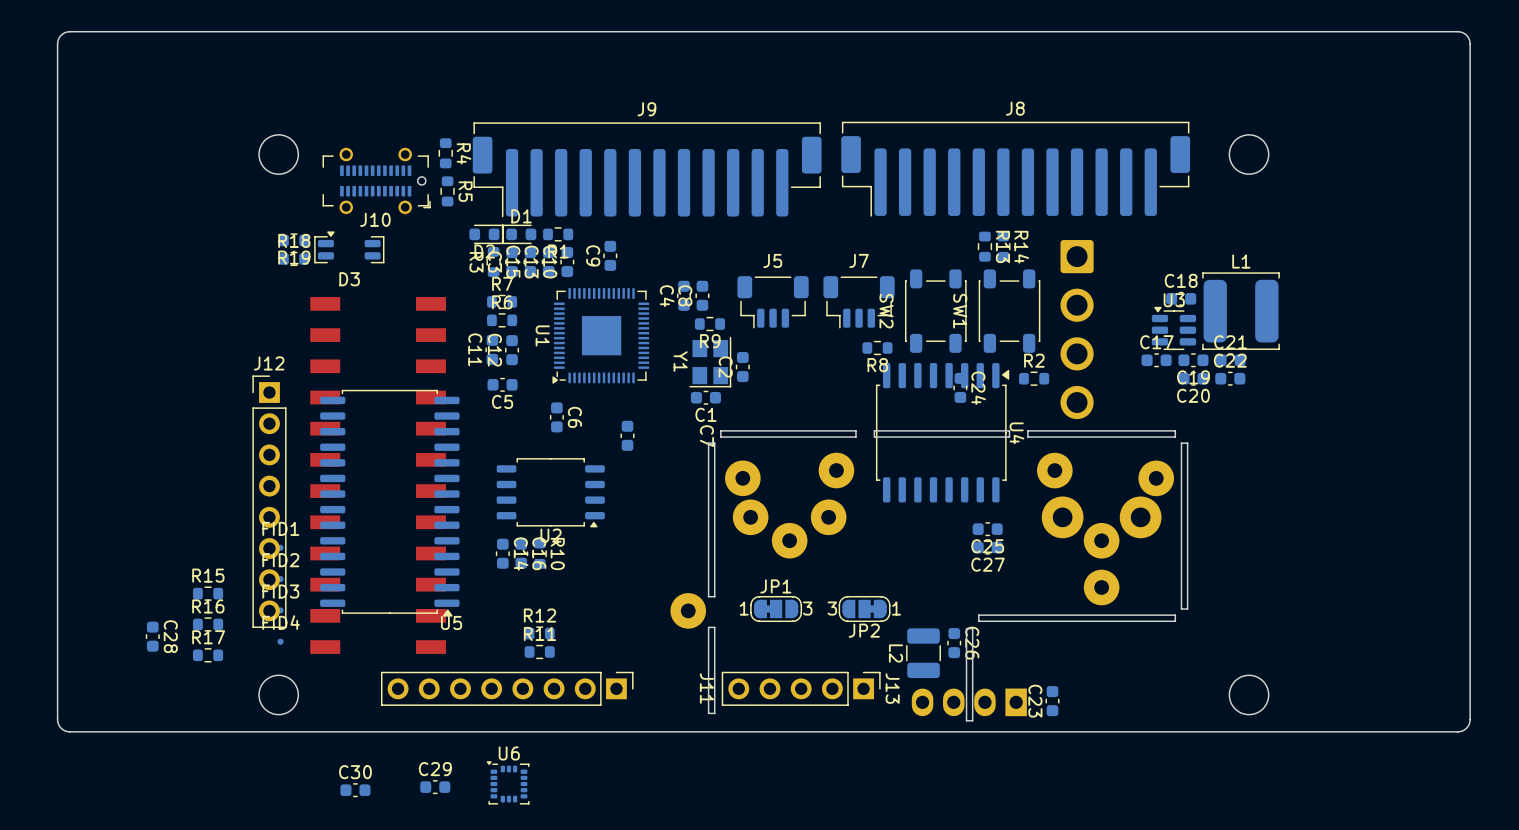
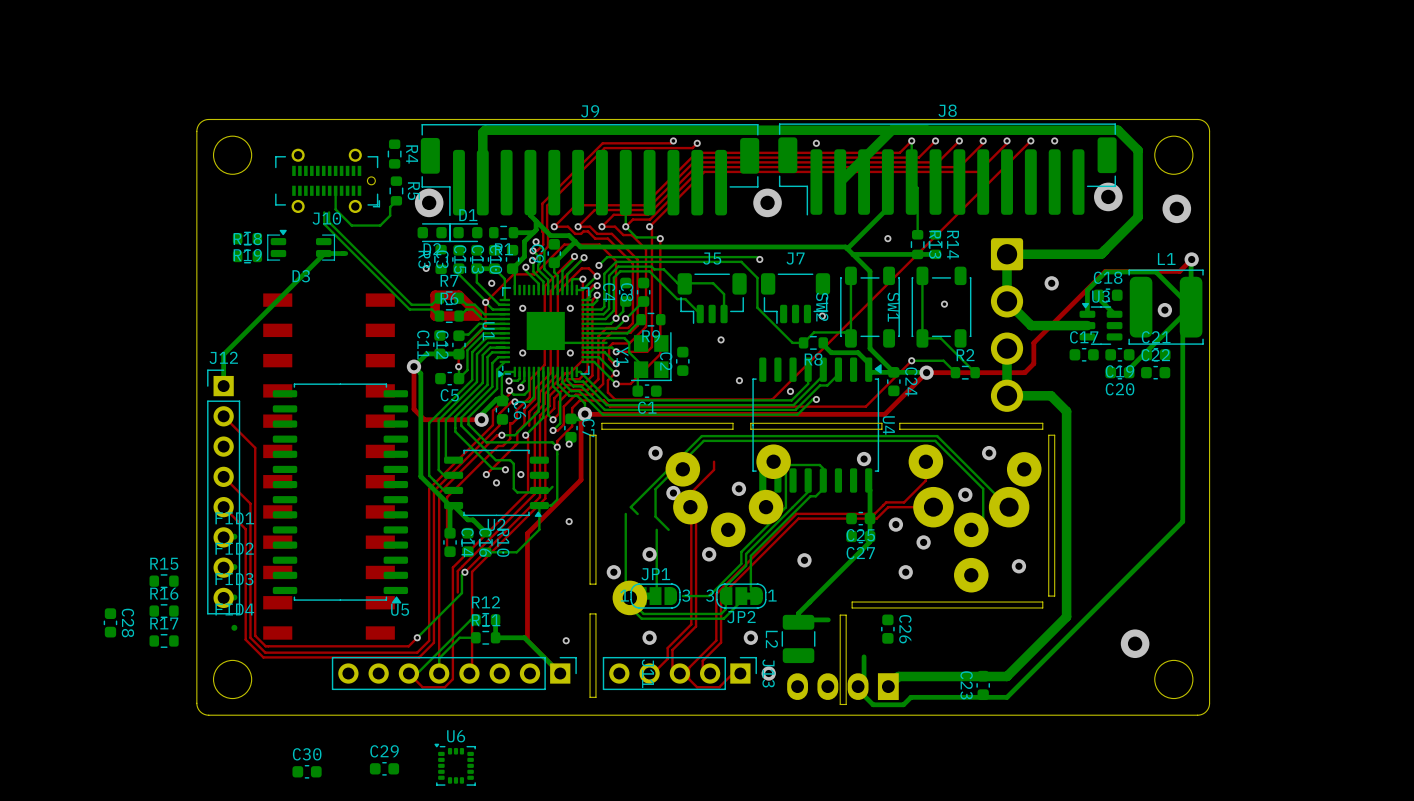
bottom track: none -> (892, 130) (840, 182)
top track: none -> (673, 140) (671, 143) (602, 143) (542, 203) (543, 244) (537, 250) (532, 250)
via: none -> (673, 140)
top track: none -> (911, 140) (899, 152) (696, 152) (644, 205) (575, 205) (554, 226) (567, 226) (575, 233) (588, 231) (595, 238) (607, 238) (632, 263) (632, 323) (628, 327) (606, 327) (598, 336) (598, 379) (587, 389) (570, 389) (559, 401) (559, 413) (553, 419)
bottom track: none -> (911, 140) (911, 182) (917, 188) (917, 234)
via: none -> (911, 140)
top track: none -> (935, 140) (918, 157) (698, 157) (646, 210) (594, 210) (578, 226) (590, 226) (597, 233) (611, 233) (637, 259) (637, 325) (630, 332) (611, 332) (603, 341) (603, 383) (592, 394) (575, 394) (563, 406) (563, 424) (557, 430) (553, 430)
via: none -> (935, 140)
top track: none -> (959, 140) (937, 162) (700, 162) (648, 214) (613, 214) (601, 226) (615, 226) (623, 235) (631, 235) (646, 249) (646, 326) (629, 343) (612, 343) (609, 347) (609, 358) (616, 363)
via: none -> (959, 140)
top track: none -> (983, 140) (983, 143) (959, 167) (702, 167) (650, 219) (632, 219) (625, 226)
via: none -> (983, 140)
top track: none -> (1007, 140) (1007, 143) (978, 171) (704, 171) (649, 226) (651, 229) (651, 347) (647, 351) (616, 351) (617, 350)
via: none -> (1007, 140)
top track: none -> (1030, 140) (772, 399) (615, 399) (607, 392) (607, 380) (616, 373)
via: none -> (1030, 140)
via: none -> (1054, 140)
top track: none -> (697, 143) (692, 148) (604, 148) (547, 205) (547, 246) (532, 260)
via: none -> (697, 143)
via: none -> (816, 143)
bottom track: none -> (482, 182) (482, 132) (485, 130) (1117, 130) (1138, 150) (1138, 217) (1100, 254) (1007, 254) (1007, 301) (1031, 325) (1087, 325)
bottom track: none -> (530, 182) (530, 215) (550, 235) (569, 235) (580, 246) (845, 246) (870, 271) (870, 348) (893, 372)
bottom track: none -> (625, 182) (625, 226) (636, 237) (660, 238)
bottom track: none -> (887, 182) (887, 208) (847, 248)
bottom track: none -> (335, 190) (335, 209) (351, 225) (380, 225) (390, 215) (390, 207) (396, 200)
via: none -> (1108, 196)
via: none -> (429, 202)
via: none -> (767, 202)
via: none -> (1176, 208)
bottom track: none -> (324, 212) (324, 224) (409, 309) (432, 309) (439, 316)
bottom track: none -> (329, 212) (329, 222) (411, 304) (432, 304) (439, 298)
bottom track: none -> (536, 221) (536, 229) (524, 241) (524, 256) (512, 268) (514, 270) (514, 289)
via: none -> (554, 226)
via: none -> (578, 226)
via: none -> (601, 226)
via: none -> (625, 226)
via: none -> (649, 226)
bottom track: none -> (533, 232) (513, 232)
top track: none -> (660, 238) (660, 354) (630, 383) (616, 383)
via: none -> (660, 238)
via: none -> (887, 238)
bottom track: none -> (536, 241) (544, 250) (544, 269) (552, 277) (552, 290)
via: none -> (536, 241)
bottom track: none -> (575, 241) (554, 262) (554, 272) (557, 275) (557, 290)
via: none -> (532, 250)
bottom track: none -> (345, 253) (323, 253) (223, 354) (223, 386)
bottom track: none -> (535, 253) (539, 257) (538, 269) (548, 279) (548, 290)
bottom track: none -> (935, 254) (853, 254)
top track: none -> (574, 256) (544, 286) (544, 364) (529, 379) (529, 397) (516, 410) (516, 419) (510, 423) (510, 438) (503, 445) (498, 445) (447, 497) (445, 553)
bottom track: none -> (574, 256) (574, 258) (562, 270) (562, 290)
via: none -> (574, 256)
top track: none -> (584, 257) (550, 291) (550, 373) (535, 388) (535, 399) (524, 409) (524, 424) (517, 431) (517, 443) (486, 474)
bottom track: none -> (584, 257) (567, 274) (567, 290)
via: none -> (584, 257)
bottom track: none -> (532, 260) (533, 271) (543, 281) (543, 290)
via: none -> (532, 260)
bottom track: none -> (759, 259) (757, 257) (607, 257) (598, 265)
via: none -> (759, 259)
top track: none -> (1191, 259) (1179, 271) (1105, 271) (1033, 342) (1033, 363) (1024, 372) (926, 372) (884, 414) (584, 414) (581, 417) (581, 479) (527, 533) (527, 640) (560, 673)
bottom track: none -> (1191, 259) (1191, 307) (1129, 369) (1129, 372)
via: none -> (1191, 259)
via: none -> (598, 265)
bottom track: none -> (525, 267) (525, 270) (538, 283) (538, 290)
via: none -> (525, 267)
via: none -> (426, 268)
bottom track: none -> (458, 268) (458, 274) (492, 309) (504, 309)
bottom track: none -> (850, 275) (850, 338) (844, 332) (814, 332) (803, 342) (792, 342) (757, 307) (757, 277) (741, 261) (616, 261) (604, 273) (604, 306) (601, 309) (586, 309)
bottom track: none -> (922, 275) (922, 338) (940, 338) (975, 372)
top track: none -> (597, 276) (588, 268) (581, 268) (557, 292) (557, 374) (539, 392) (539, 401) (529, 411) (529, 425)
bottom track: none -> (597, 276) (582, 290) (576, 290)
via: none -> (597, 276)
top track: none -> (582, 279) (582, 360) (569, 373) (565, 373) (544, 393) (544, 403) (534, 413) (534, 493) (457, 571) (457, 592)
bottom track: none -> (582, 279) (572, 279) (572, 290)
via: none -> (582, 279)
via: none -> (491, 283)
via: none -> (1051, 283)
top track: none -> (597, 285) (593, 285) (587, 291) (587, 370) (579, 379) (566, 379) (549, 395) (549, 406) (539, 415) (539, 497) (464, 572)
bottom track: none -> (597, 285) (590, 292) (590, 296) (586, 299)
via: none -> (597, 285)
top track: none -> (458, 295) (477, 313) (477, 316) (435, 316) (435, 295) (458, 295)
top track: none -> (597, 295) (592, 299) (592, 375) (582, 385) (567, 385) (554, 398) (554, 408) (545, 417) (545, 498) (472, 571) (472, 670) (469, 673)
bottom track: none -> (597, 295) (597, 300) (593, 304) (586, 304)
via: none -> (597, 295)
bottom track: none -> (1098, 295) (1098, 298) (1114, 314)
bottom track: none -> (459, 298) (466, 304) (474, 304) (484, 314) (504, 314)
bottom track: none -> (504, 299) (504, 278) (494, 268) (476, 268) (476, 282) (499, 304) (504, 304)
bottom track: none -> (623, 301) (623, 311) (610, 323) (586, 323)
bottom track: none -> (640, 301) (640, 304) (616, 328) (586, 328)
bottom track: none -> (1194, 301) (1182, 313) (1182, 521) (1007, 697) (910, 697) (903, 704) (873, 704) (858, 689) (858, 686) (864, 680) (864, 656)
via: none -> (485, 302)
via: none -> (944, 304)
via: none -> (522, 308)
via: none -> (570, 308)
via: none -> (1164, 310)
bottom track: none -> (1194, 310) (1155, 271) (1105, 271) (1087, 290) (1087, 314)
bottom track: none -> (700, 313) (685, 299) (677, 299) (649, 271) (620, 271) (613, 277) (613, 310) (605, 319) (586, 319)
bottom track: none -> (724, 313) (724, 294) (713, 283) (677, 283) (663, 269) (654, 269) (651, 266) (618, 266) (609, 275) (609, 308) (603, 314) (586, 314)
bottom track: none -> (459, 316) (466, 309) (472, 309) (482, 319) (504, 319)
via: none -> (822, 316)
via: none -> (616, 318)
top track: none -> (616, 318) (616, 261) (599, 244) (564, 244) (534, 274) (513, 274) (485, 302) (485, 326) (458, 353) (458, 366)
via: none -> (625, 318)
bottom track: none -> (641, 319) (627, 333) (586, 333)
bottom track: none -> (504, 323) (479, 323) (468, 334) (464, 334)
bottom track: none -> (504, 328) (482, 328) (457, 353) (426, 353) (413, 366) (420, 373) (420, 476) (449, 505) (453, 505)
bottom track: none -> (545, 330) (557, 342) (606, 342)
bottom track: none -> (504, 333) (484, 333) (467, 350) (467, 370) (458, 378) (458, 366)
bottom track: none -> (504, 338) (486, 338) (472, 352) (472, 379) (429, 422) (429, 475) (444, 490) (453, 490)
bottom track: none -> (586, 338) (624, 338) (629, 342) (629, 352) (641, 364) (641, 369) (637, 372) (637, 391)
via: none -> (721, 339)
bottom track: none -> (504, 342) (488, 342) (476, 354) (476, 381) (438, 420) (438, 469) (444, 475) (453, 475)
bottom track: none -> (822, 343) (831, 352) (858, 352) (868, 363) (868, 369) (871, 372) (926, 372)
bottom track: none -> (504, 347) (490, 347) (482, 355) (482, 382) (445, 419) (445, 459) (453, 460)
bottom track: none -> (586, 347) (612, 347) (616, 351)
bottom track: none -> (1007, 348) (1007, 395) (1050, 395) (1066, 411) (1066, 616) (1007, 676) (898, 676) (888, 686)
bottom track: none -> (504, 352) (492, 352) (487, 357) (487, 384) (455, 417) (455, 431) (492, 468) (505, 469)
bottom track: none -> (586, 352) (604, 352) (616, 363)
via: none -> (616, 351)
via: none -> (522, 353)
via: none -> (570, 353)
bottom track: none -> (504, 357) (498, 357) (492, 363) (492, 386) (461, 417) (461, 425) (495, 460) (510, 460) (513, 463) (513, 488) (517, 492) (537, 492) (539, 490) (548, 490) (552, 486)
bottom track: none -> (586, 357) (598, 357) (616, 373)
top track: none -> (911, 360) (865, 406) (610, 406) (603, 400) (579, 400) (572, 408) (572, 426) (557, 441) (557, 447)
bottom track: none -> (911, 360) (943, 360) (955, 372)
via: none -> (911, 360)
bottom track: none -> (504, 361) (497, 369) (497, 388) (468, 417) (468, 424) (486, 442) (552, 442) (557, 447) (557, 499) (551, 505) (539, 505) (539, 529) (516, 552) (483, 552)
bottom track: none -> (586, 361) (594, 361) (613, 381)
via: none -> (616, 363)
top track: none -> (413, 366) (413, 409) (424, 419) (481, 419)
via: none -> (413, 366)
via: none -> (458, 366)
bottom track: none -> (808, 369) (808, 383) (791, 400) (608, 400) (580, 371) (576, 371)
bottom track: none -> (823, 369) (823, 375) (793, 405) (606, 405) (583, 381) (575, 381) (572, 378) (572, 371)
bottom track: none -> (838, 369) (838, 374) (827, 385) (820, 385) (795, 409) (604, 409) (581, 386) (573, 386) (567, 380) (567, 371)
bottom track: none -> (514, 371) (505, 371) (501, 375) (501, 394) (506, 399) (496, 399) (481, 414) (481, 419) (485, 416)
bottom track: none -> (519, 371) (517, 380) (509, 381)
bottom track: none -> (524, 371) (524, 381) (520, 384) (520, 387)
bottom track: none -> (529, 371) (529, 390) (524, 394) (513, 394) (509, 390)
bottom track: none -> (533, 371) (533, 397) (529, 401) (513, 401)
bottom track: none -> (538, 371) (538, 411) (514, 435) (501, 435)
bottom track: none -> (543, 371) (543, 417) (525, 435)
bottom track: none -> (548, 371) (548, 414) (553, 419)
bottom track: none -> (552, 371) (552, 386) (560, 393) (560, 423) (553, 430)
bottom track: none -> (557, 371) (557, 384) (569, 395) (577, 395) (584, 403) (584, 414) (580, 418) (570, 418)
bottom track: none -> (562, 371) (562, 382) (571, 391) (579, 391) (602, 414) (797, 414) (812, 399) (816, 399)
via: none -> (926, 372)
via: none -> (616, 373)
via: none -> (739, 380)
via: none -> (509, 381)
via: none -> (616, 383)
via: none -> (520, 387)
top track: none -> (509, 390) (509, 394) (492, 410) (492, 425) (429, 488) (429, 640) (417, 652) (265, 652) (250, 637) (250, 503) (223, 476)
via: none -> (509, 390)
via: none -> (790, 391)
via: none -> (816, 399)
top track: none -> (514, 401) (511, 401) (499, 413) (499, 425) (433, 491) (433, 642) (419, 657) (263, 657) (245, 639) (245, 529) (223, 507)
via: none -> (514, 401)
via: none -> (584, 414)
top track: none -> (223, 416) (255, 447) (255, 635) (265, 646) (408, 646) (417, 637)
via: none -> (481, 419)
via: none -> (553, 419)
board edge: (720, 430) (720, 437) -> (661, 423) (601, 423) (601, 429) (661, 429)
board edge: (812, 430) (794, 430) -> (750, 423) (750, 429)
board edge: (855, 430) (855, 437) -> (810, 429) (792, 429)
board edge: (874, 430) (874, 437) -> (810, 423) (792, 423)
board edge: (966, 430) (948, 430) -> (899, 423) (899, 429)
board edge: (1009, 430) (1009, 437) -> (959, 429) (941, 429)
board edge: (1027, 430) (1027, 437) -> (959, 423) (941, 423)
board edge: (1113, 430) (1175, 430) (1175, 437) (1113, 437) -> (1042, 423) (1042, 429)
U4 position: (942, 432) -> (817, 425)
C7 name position: C7 (706, 436) -> C7 (588, 428)
board edge: (812, 437) (794, 437) -> (732, 423) (732, 429)
board edge: (966, 437) (948, 437) -> (881, 423) (881, 429)
via: none -> (553, 430)
top track: none -> (501, 435) (497, 435) (439, 493) (439, 673)
via: none -> (501, 435)
top track: none -> (525, 435) (528, 437) (528, 492) (452, 567) (452, 679) (444, 687) (422, 687) (408, 673)
via: none -> (525, 435)
board edge: (714, 443) (708, 443) (708, 596) (714, 596) (714, 443) -> (595, 435) (590, 435) (590, 584) (595, 584) (595, 435)
board edge: (1187, 443) (1181, 443) (1181, 609) (1187, 609) (1187, 443) -> (1054, 435) (1048, 435) (1048, 596) (1054, 596) (1054, 435)
via: none -> (569, 444)
via: none -> (557, 447)
via: none -> (655, 453)
via: none -> (989, 453)
via: none -> (864, 459)
top track: none -> (714, 461) (714, 469) (685, 498) (685, 515) (691, 521) (691, 624) (667, 648) (667, 658) (653, 673) (642, 673)
top track: none -> (925, 461) (925, 480) (904, 502) (886, 502) (874, 513) (796, 513) (716, 594) (716, 640) (689, 667) (689, 679) (697, 687) (719, 687) (732, 673)
bottom track: none -> (823, 468) (819, 465) (788, 465) (785, 468) (785, 507) (741, 551) (741, 563) (709, 596) (682, 596)
via: none -> (505, 469)
via: none -> (486, 474)
via: none -> (520, 474)
bottom track: none -> (823, 476) (823, 488) (815, 496) (810, 496) (750, 555) (750, 590) (756, 596)
via: none -> (496, 482)
via: none -> (738, 488)
bottom track: none -> (808, 488) (808, 491) (746, 553) (746, 565) (725, 586) (725, 609) (721, 613) (643, 613) (640, 610) (640, 596)
bottom track: none -> (868, 488) (870, 541) (798, 613) (798, 622) (800, 619) (828, 619)
top track: none -> (933, 490) (933, 507) (888, 507) (876, 518) (798, 518) (721, 596) (721, 642) (702, 660) (702, 673)
via: none -> (673, 493)
via: none -> (965, 494)
top track: none -> (697, 497) (706, 507) (695, 518) (696, 626) (672, 649) (672, 673)
bottom track: none -> (453, 505) (450, 509) (450, 533)
bottom track: none -> (453, 505) (467, 519) (473, 519) (485, 532)
bottom track: none -> (625, 513) (625, 602) (641, 618) (723, 618) (741, 601) (741, 596)
bottom track: none -> (637, 513) (630, 507) (701, 436) (937, 436) (1009, 507) (1009, 522)
C25 position: (987, 529) -> (860, 518)
part position: (1105, 529) -> (975, 518)
via: none -> (569, 521)
via: none -> (895, 524)
bottom track: none -> (656, 529) (655, 596)
bottom track: none -> (971, 529) (983, 517) (983, 488) (935, 440) (703, 440) (655, 489) (655, 516) (668, 529)
C27 position: (987, 547) -> (860, 536)
via: none -> (923, 542)
via: none -> (649, 554)
via: none -> (709, 554)
via: none -> (804, 560)
via: none -> (1018, 566)
bottom track: none -> (464, 572) (461, 575) (461, 593) (417, 637)
via: none -> (464, 572)
via: none -> (613, 572)
via: none -> (905, 572)
JP1 position: (776, 609) -> (655, 596)
JP2 position: (864, 609) -> (741, 596)
board edge: (978, 615) (978, 621) -> (911, 602) (852, 602) (852, 607) (911, 607)
board edge: (1113, 615) (1175, 615) (1175, 621) (1113, 621) -> (1042, 602) (1042, 607)
board edge: (714, 627) (714, 713) (708, 713) (708, 627) (714, 627) -> (595, 613) (595, 697) (590, 697) (590, 613) (595, 613)
board edge: (972, 628) (966, 628) (966, 720) (972, 720) (972, 628) -> (846, 615) (840, 615) (840, 704) (846, 704) (846, 615)
bottom track: none -> (475, 619) (470, 619) (417, 673) (408, 673)
bottom track: none -> (495, 619) (495, 637) (524, 637) (560, 673)
via: none -> (417, 637)
bottom track: none -> (475, 637) (459, 637) (439, 658) (439, 673)
via: none -> (649, 637)
via: none -> (750, 637)
L2 position: (923, 653) -> (798, 638)
via: none -> (566, 640)
via: none -> (1135, 643)
J13 position: (801, 688) -> (679, 673)
via: none -> (768, 673)
part position: (969, 702) -> (842, 686)
board edge: (1273, 731) (1457, 731) (1465, 729) (1469, 722) (1470, 43) (1467, 36) (1460, 32) (69, 31) (63, 33) (59, 37) (57, 43) (57, 722) (62, 729) (69, 731) (254, 731) -> (1197, 715) (1206, 711) (1209, 703) (1209, 131) (1206, 122) (1197, 119) (208, 119) (202, 121) (196, 131) (196, 703) (200, 711) (208, 715)

